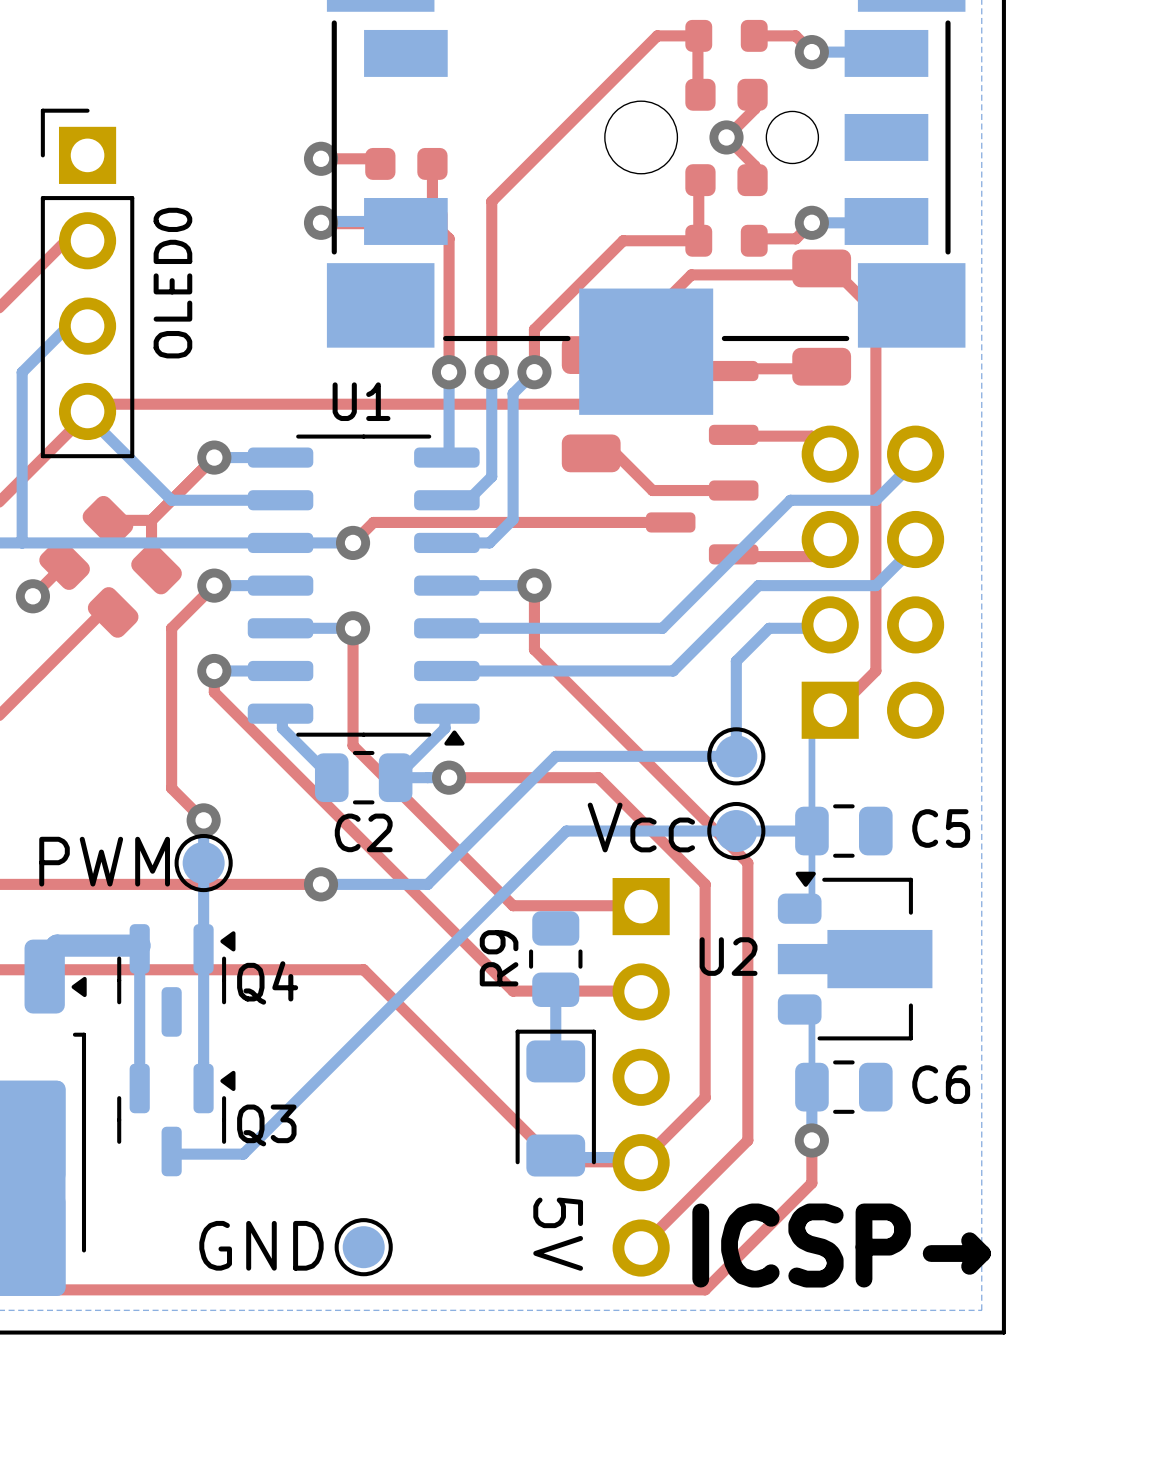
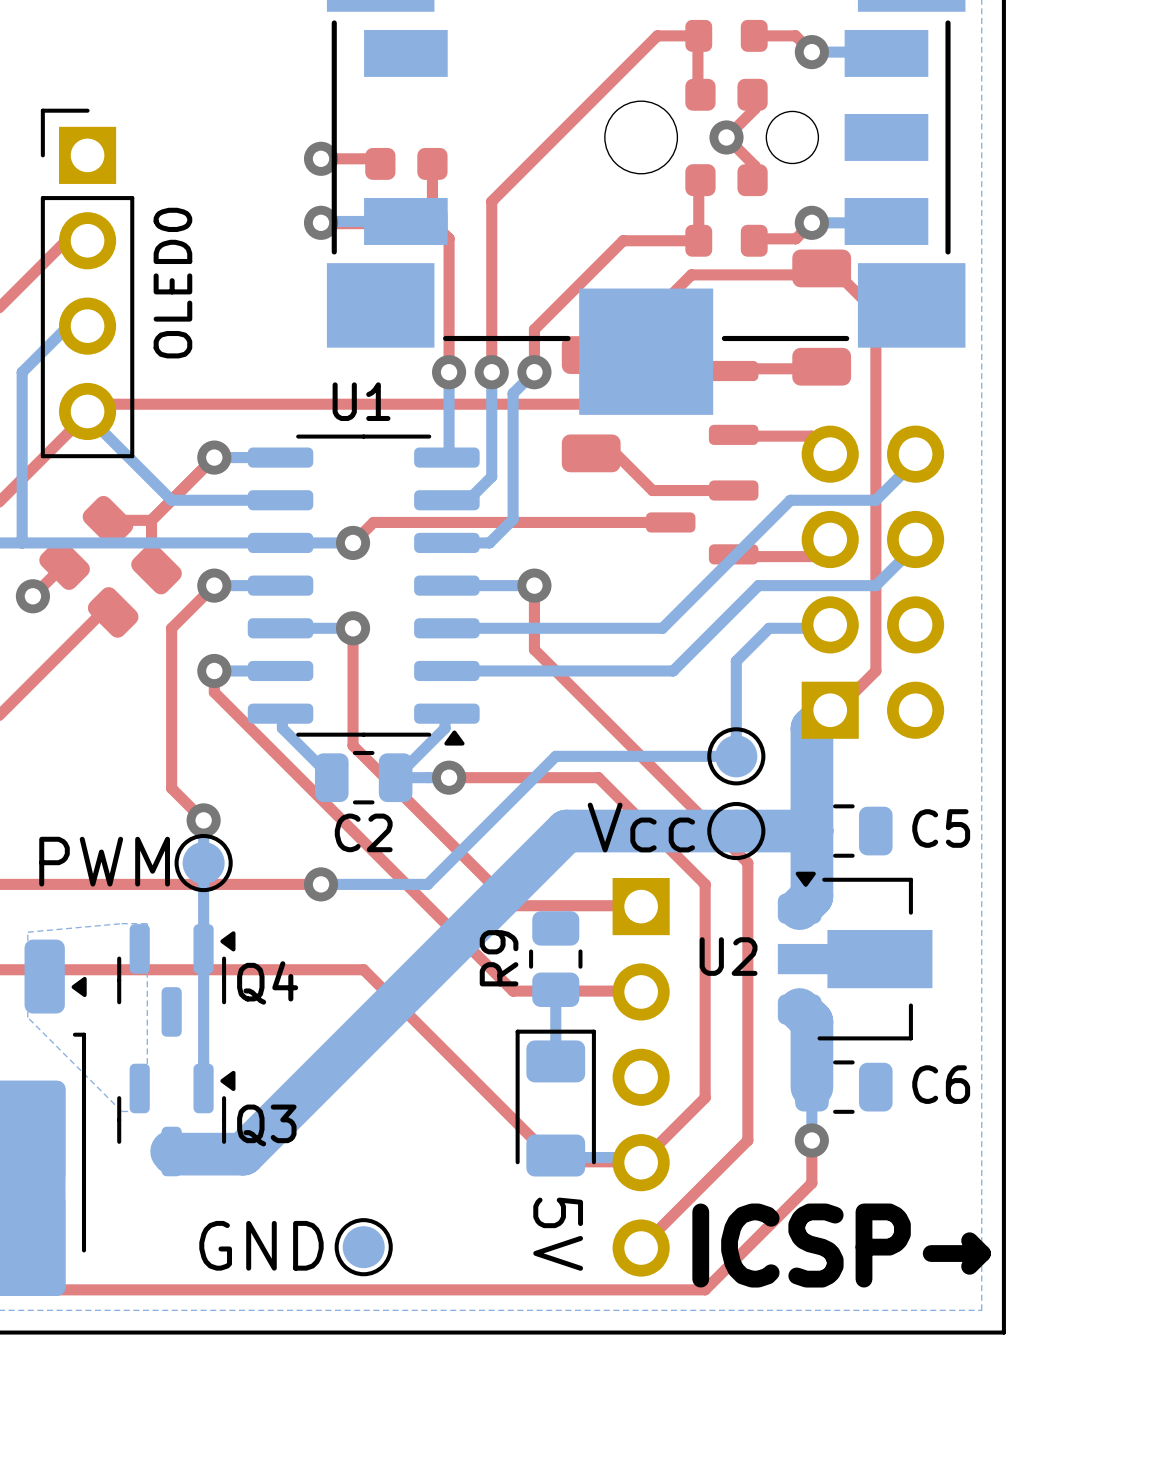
bottom track width: thin (830, 710) (811, 728) (811, 896) (799, 908) -> thick (830, 710) (811, 728) (811, 896) (799, 908)
bottom track width: thin (811, 831) (566, 831) (243, 1154) (174, 1154) (171, 1151) -> thick (811, 831) (566, 831) (243, 1154) (174, 1154) (171, 1151)
bottom zone outline: none -> (147, 923) (147, 1111) (121, 1111) (27, 1017) (27, 932) (121, 923) (147, 923)
R9 name rotation: 0° (499, 958) -> 0° counterclockwise (499, 958)
bottom track: (45, 977) (45, 956) (57, 945) (139, 945) (139, 1063) -> none
bottom track width: thin (799, 1009) (811, 1021) (811, 1087) -> thick (799, 1009) (811, 1021) (811, 1087)

